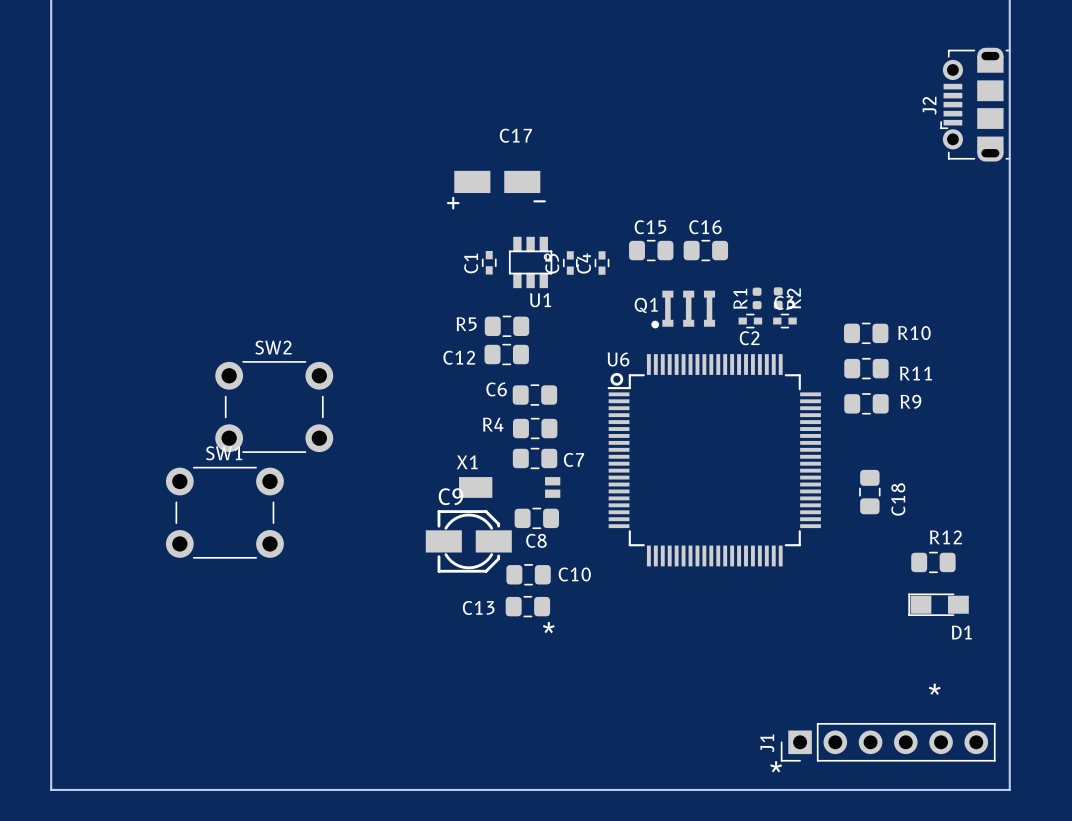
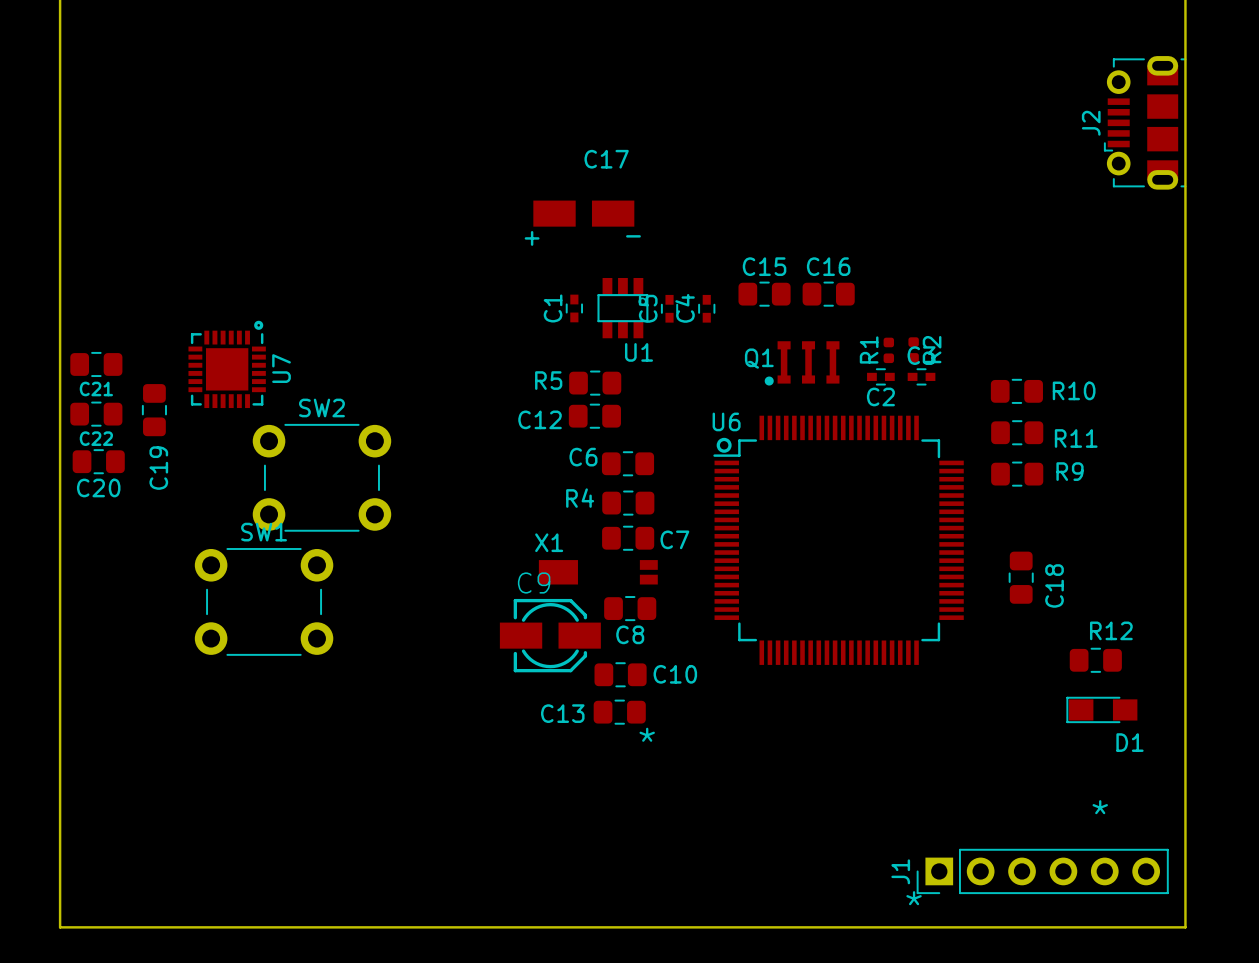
drawing: none -> [254, 320, 264, 330]
C21: none -> (96, 364)
U7: none -> (227, 369)
C19: none -> (154, 410)
C22: none -> (96, 414)
C20: none -> (98, 461)

